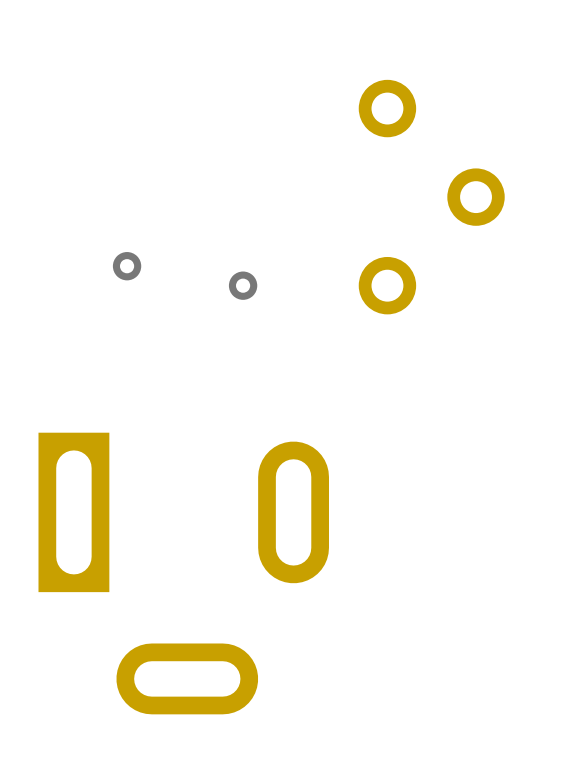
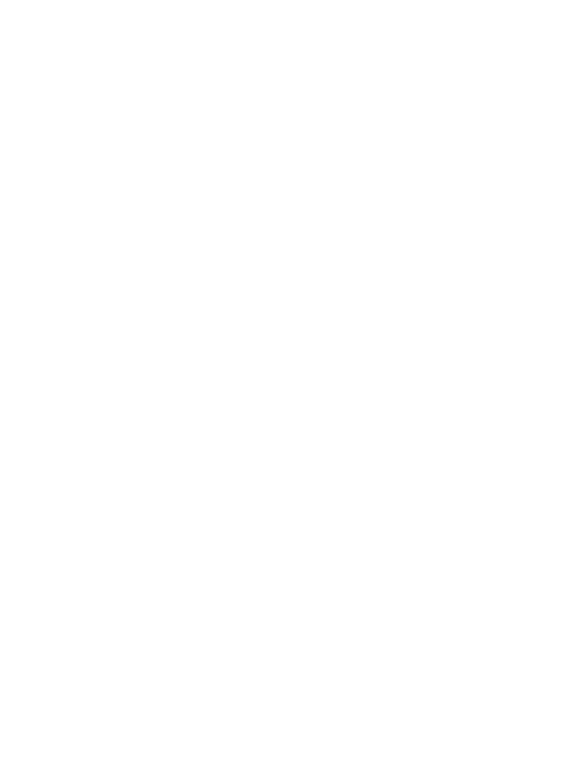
part: (431, 197) -> none
via: (127, 266) -> none
via: (243, 285) -> none
part: (183, 573) -> none

